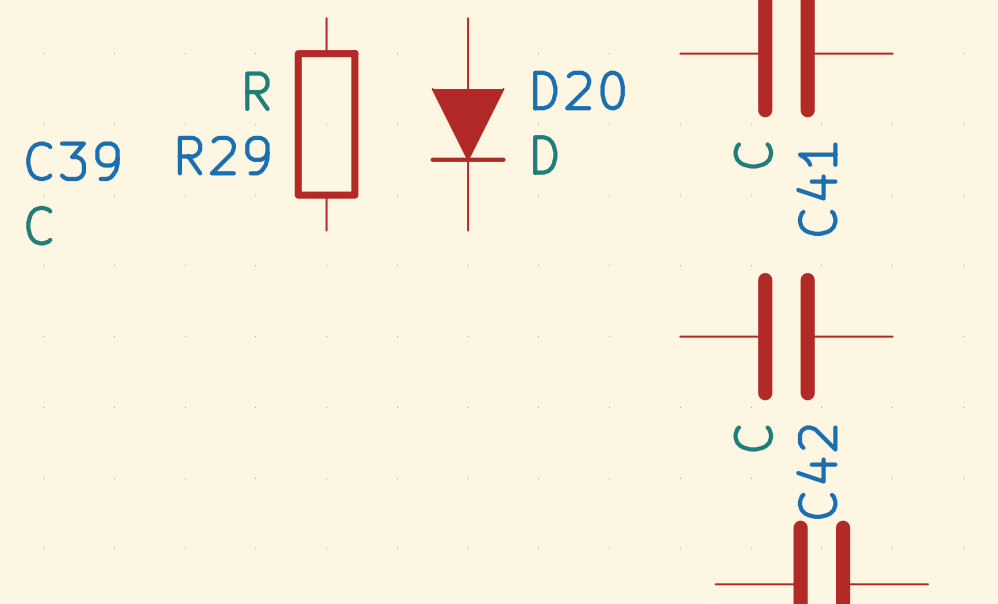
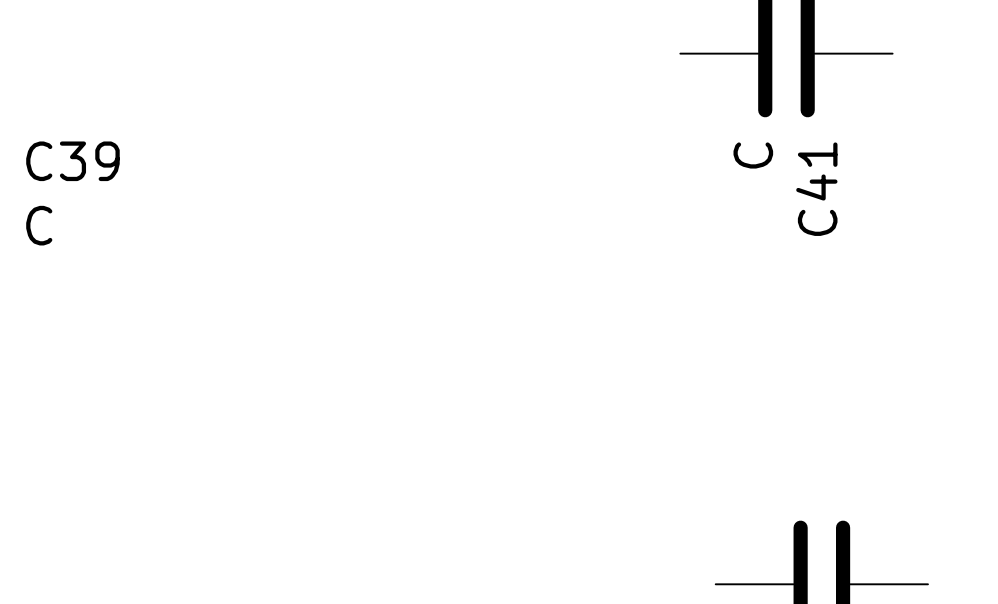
R29: R (326, 124) -> none
D20: D (468, 124) -> none
C42: C (786, 336) -> none

